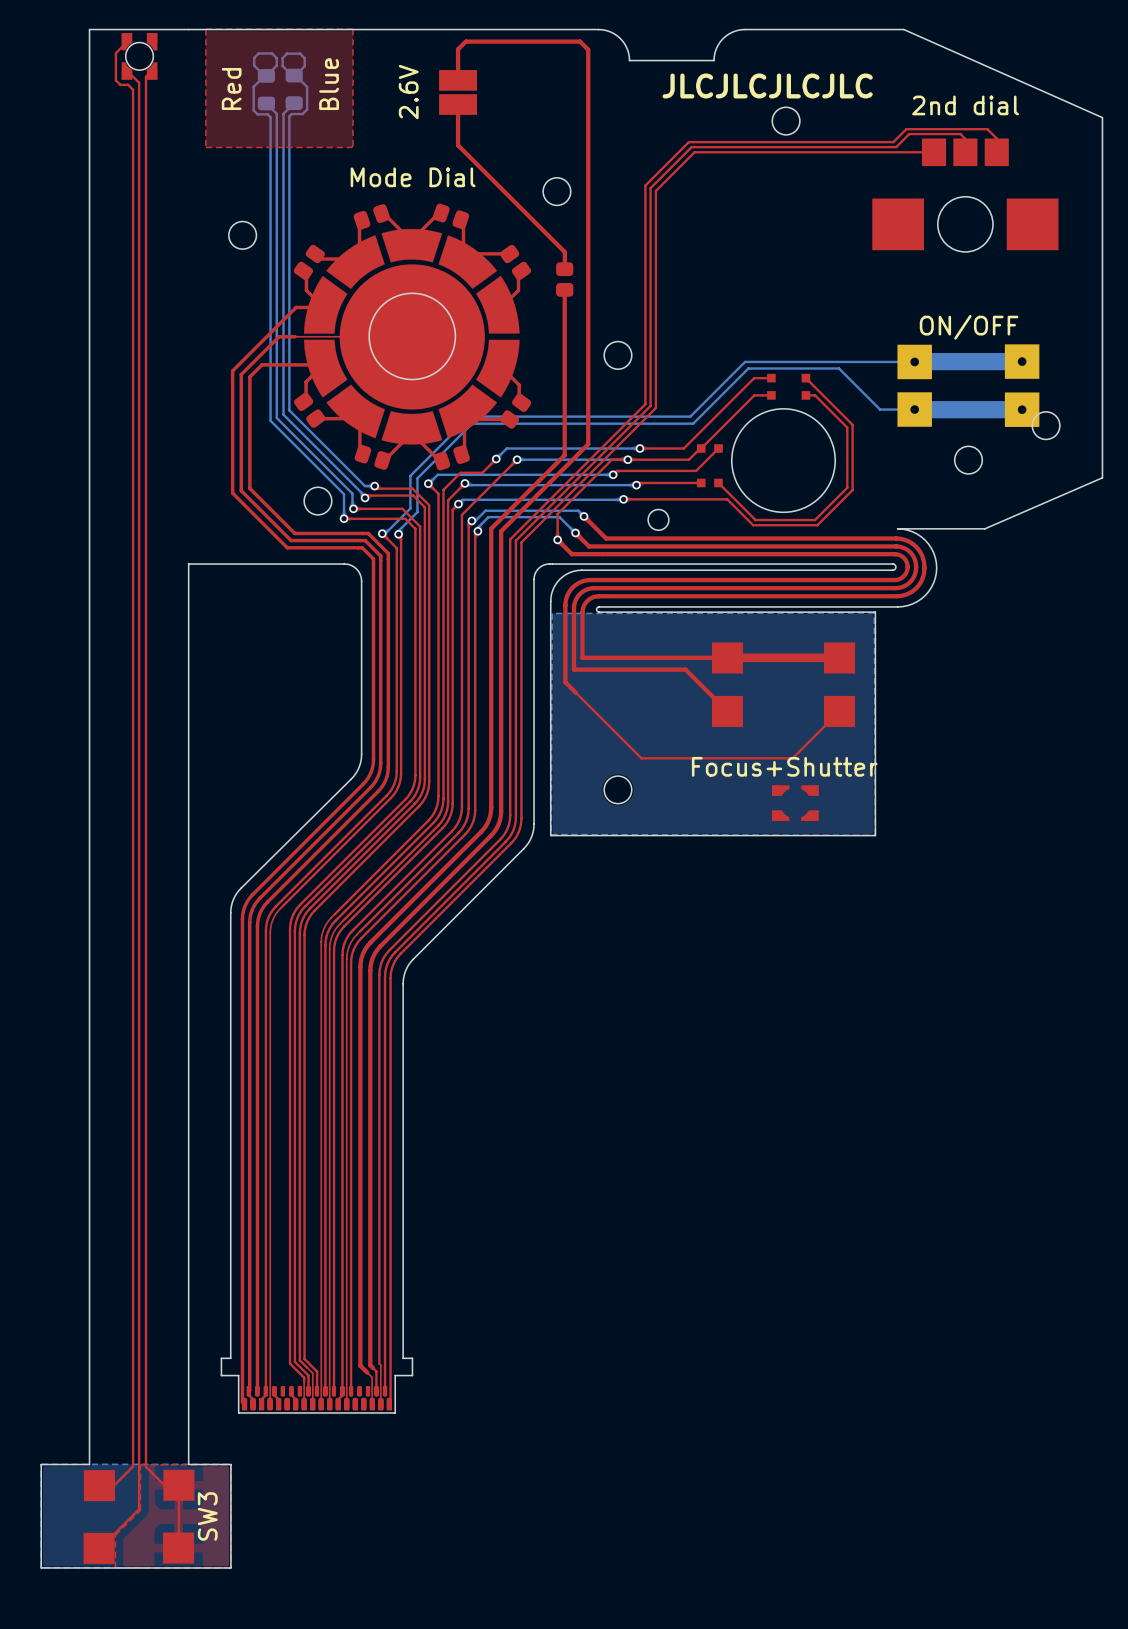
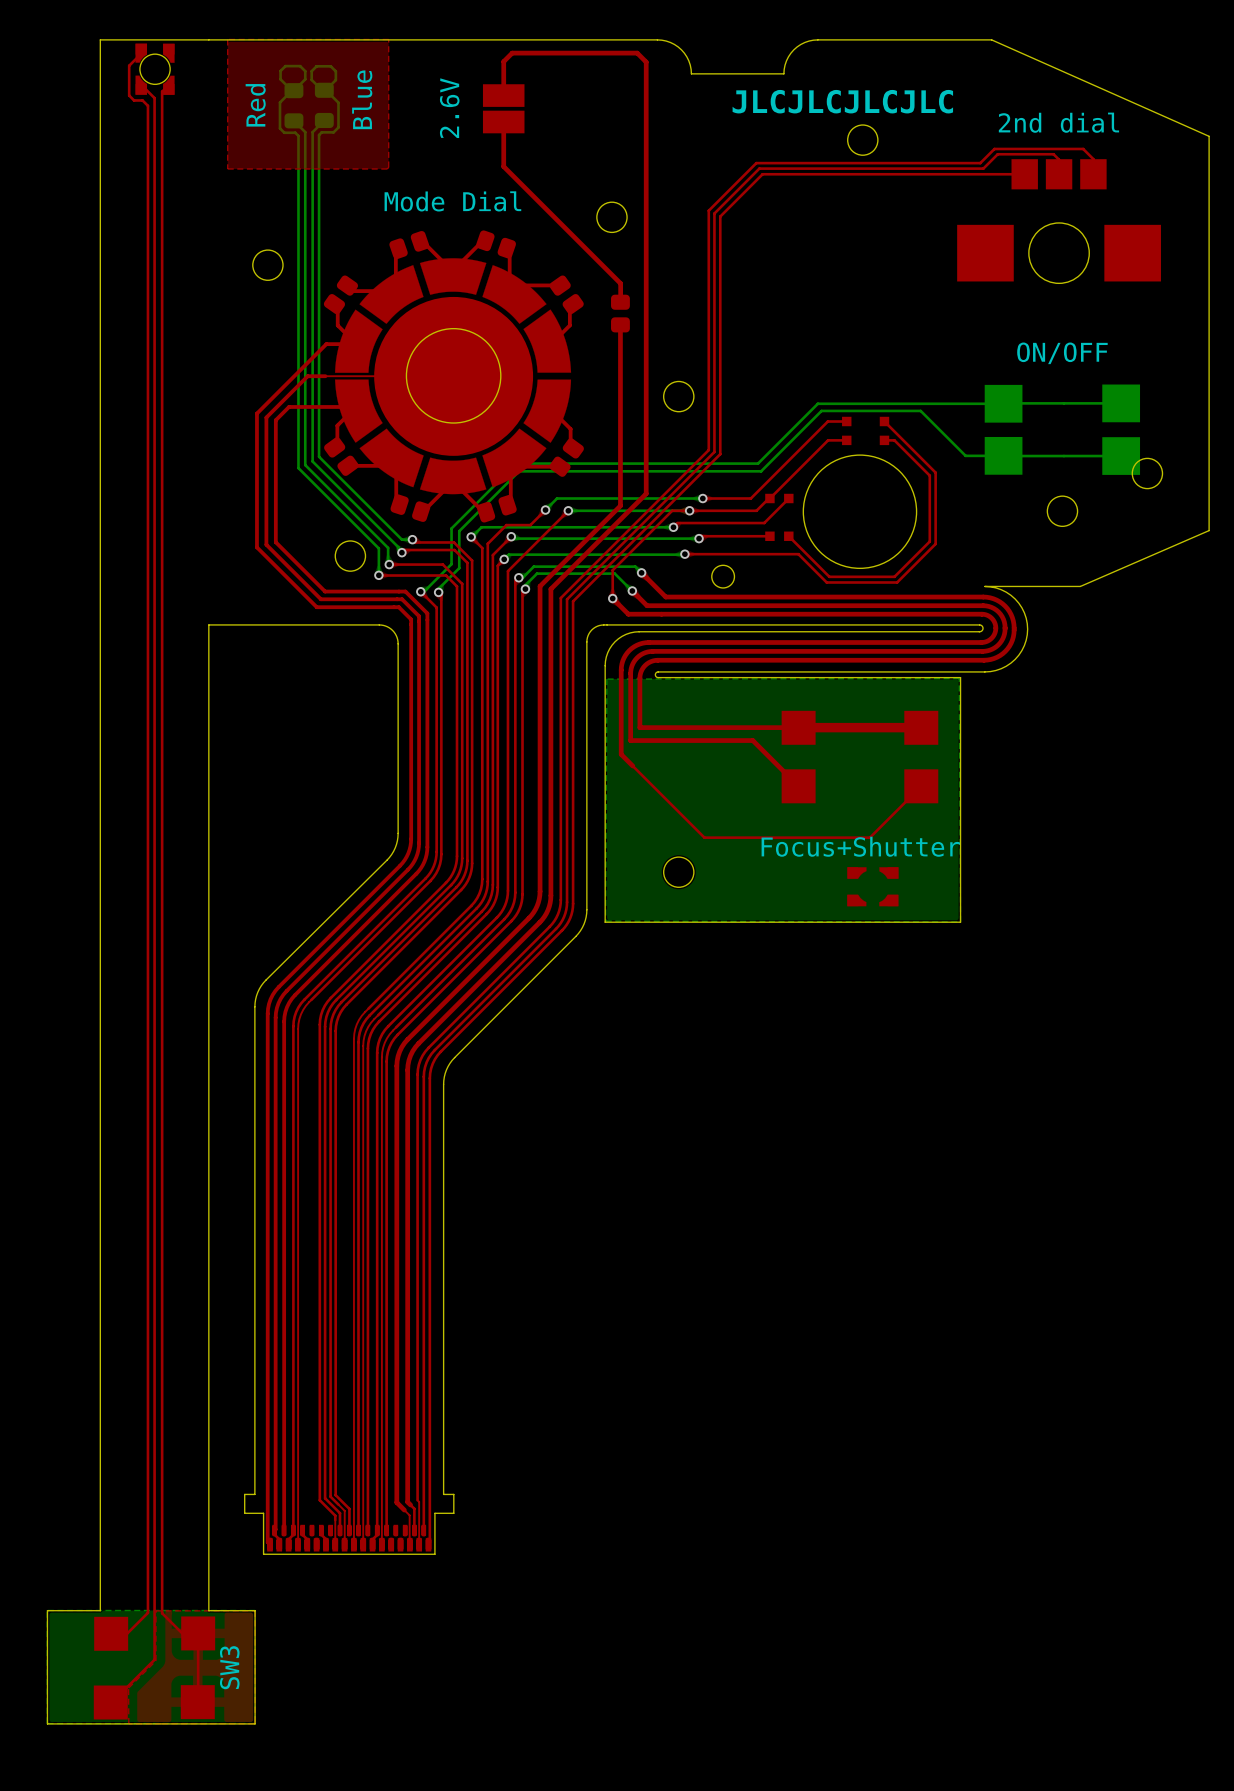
part footprint: [897, 344, 1040, 427] -> [984, 384, 1141, 475]
bottom track width: thick (916, 361) (1022, 361) -> thin (1005, 403) (1121, 403)
bottom track width: thick (916, 409) (1022, 409) -> thin (1005, 456) (1121, 456)

